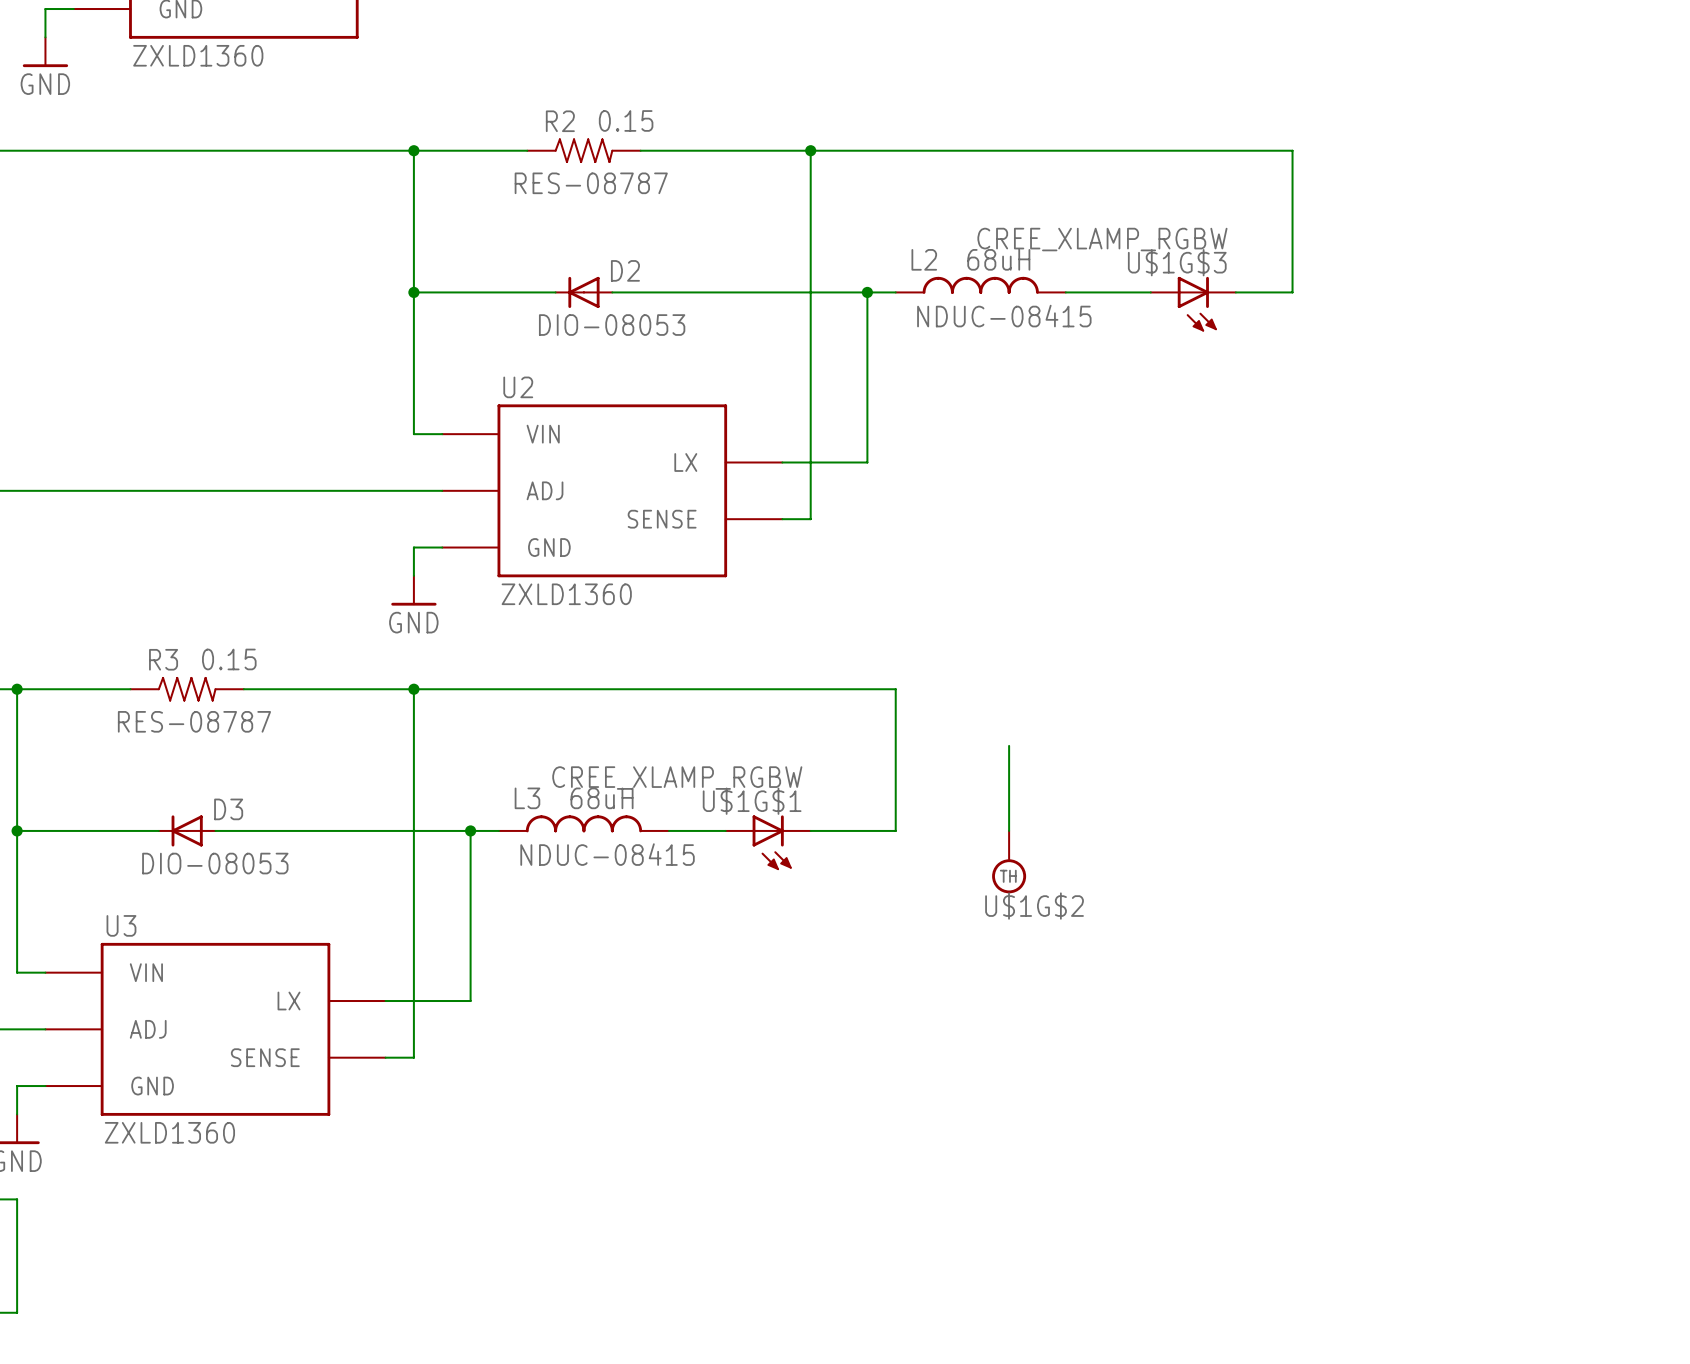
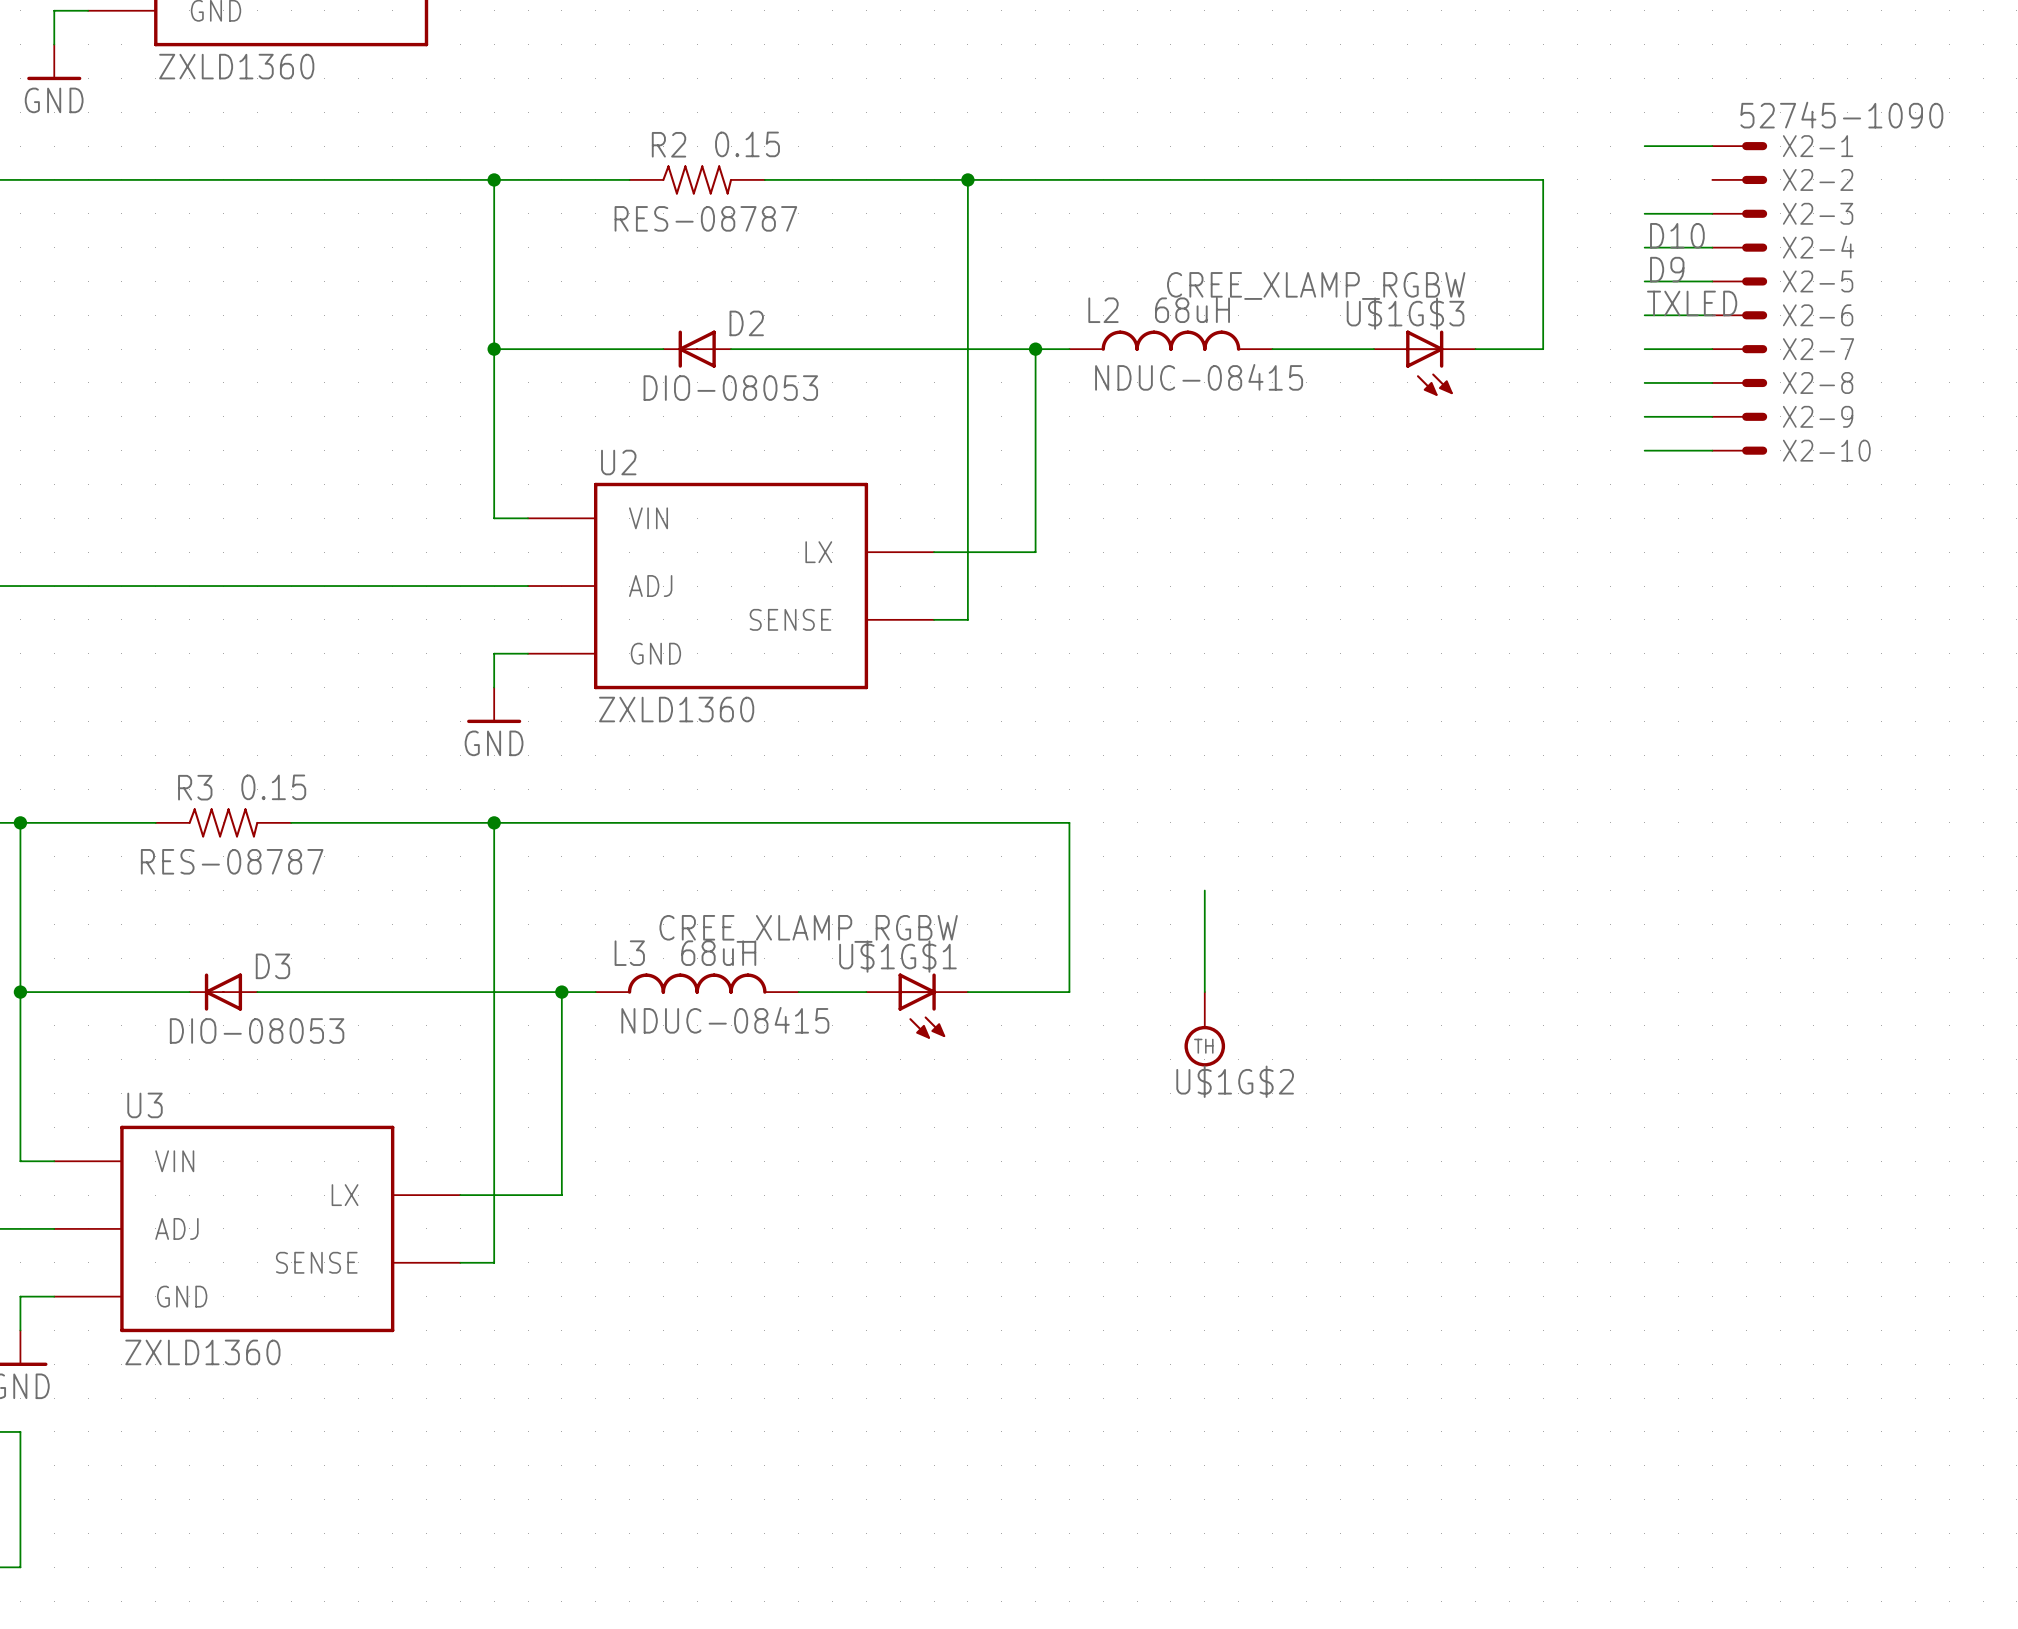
wire: none -> (1644, 146) (1712, 146)
X2-1: none -> 52745-1090 (1739, 146)
X2-2: none -> (1739, 179)
wire: none -> (1644, 213) (1712, 213)
X2-3: none -> (1739, 213)
label: none -> D10 (1677, 235)
wire: none -> (1644, 247) (1712, 247)
X2-4: none -> (1739, 247)
label: none -> D9 (1667, 269)
wire: none -> (1644, 281) (1712, 281)
X2-5: none -> (1739, 281)
label: none -> TXLED (1692, 303)
wire: none -> (1644, 315) (1712, 315)
X2-6: none -> (1739, 315)
wire: none -> (1644, 349) (1712, 349)
X2-7: none -> (1739, 349)
wire: none -> (1644, 382) (1712, 382)
X2-8: none -> (1739, 382)
wire: none -> (1644, 416) (1712, 416)
X2-9: none -> (1739, 416)
wire: none -> (1644, 450) (1712, 450)
X2-10: none -> (1739, 450)

